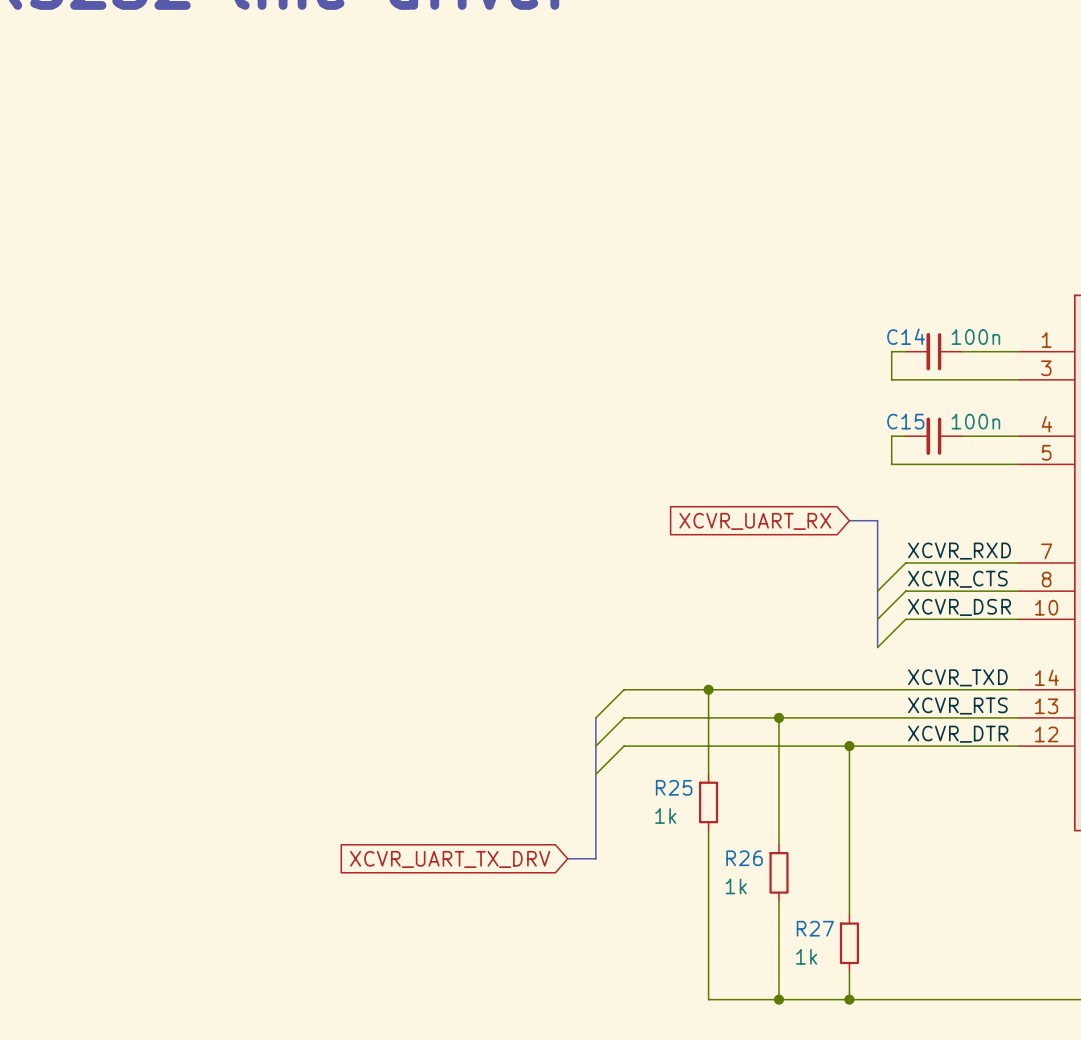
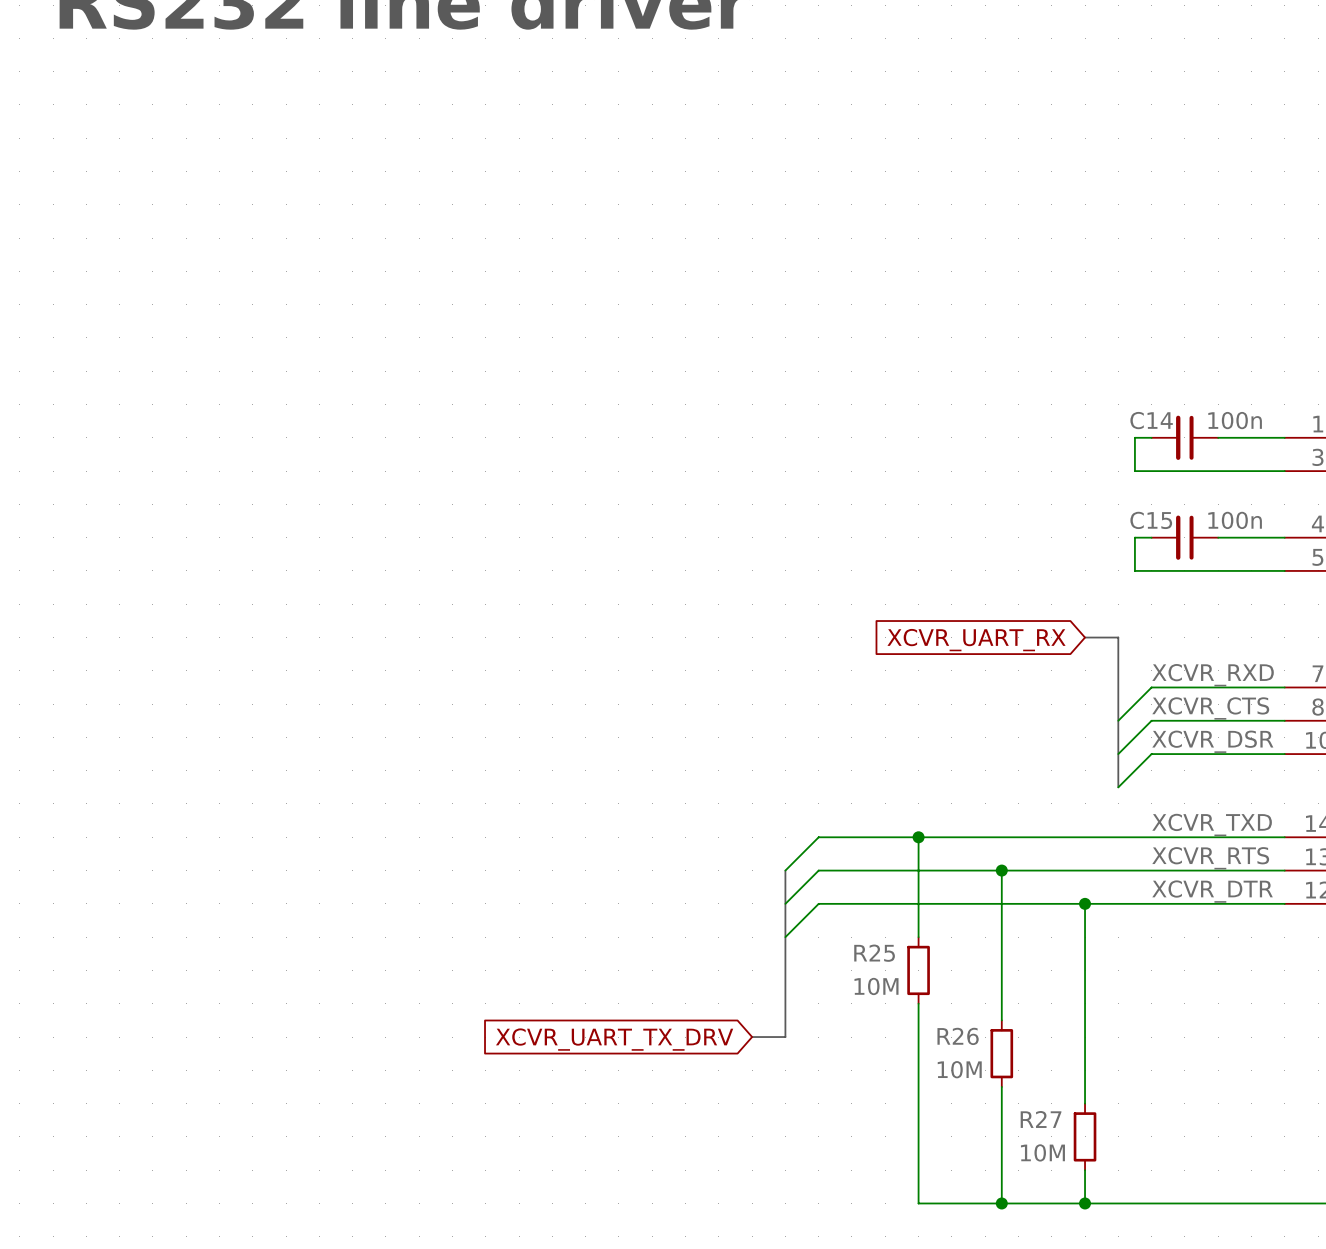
R25 value: 1k (665, 816) -> 10M (876, 986)
R26 value: 1k (736, 886) -> 10M (959, 1069)
R27 value: 1k (806, 956) -> 10M (1042, 1152)

